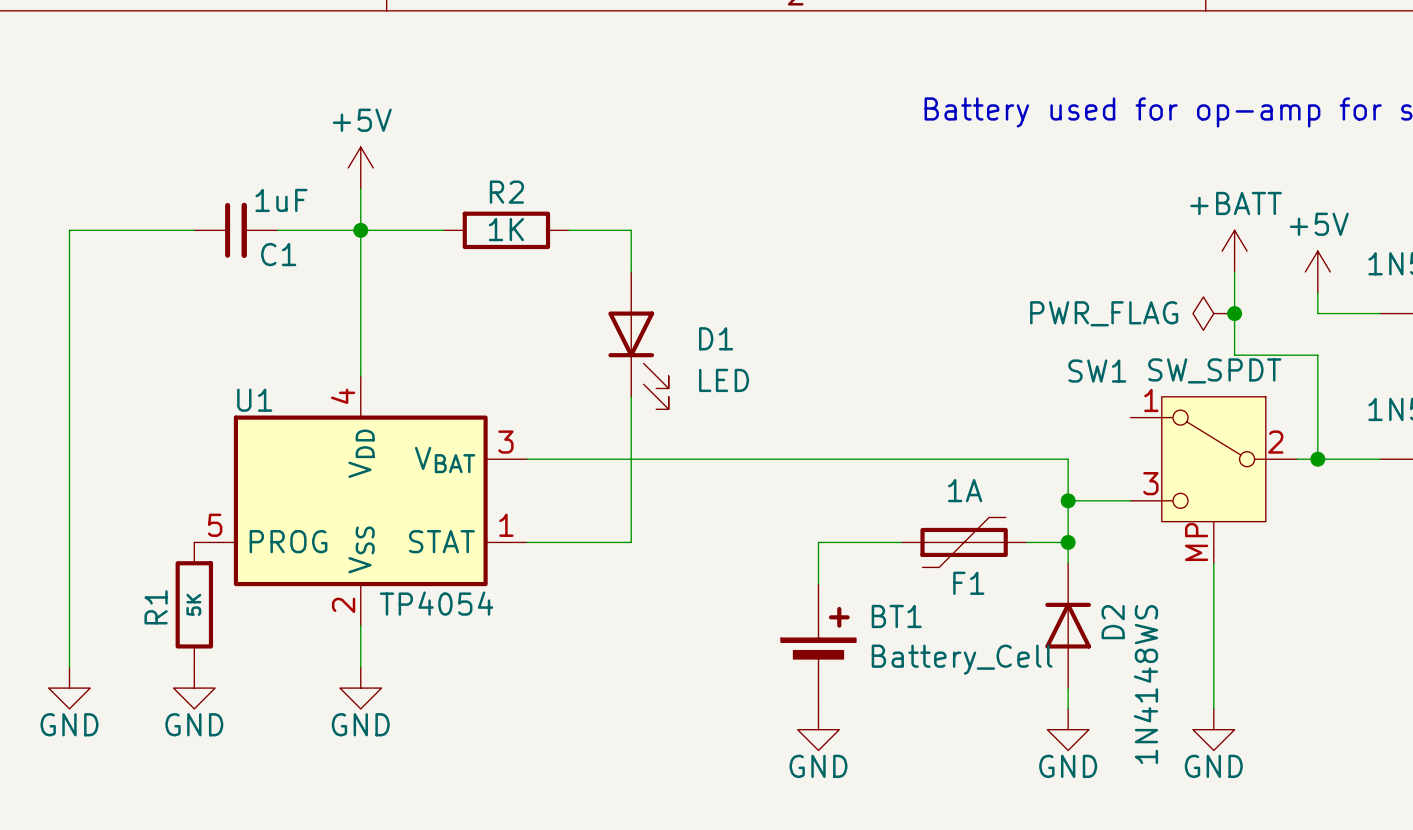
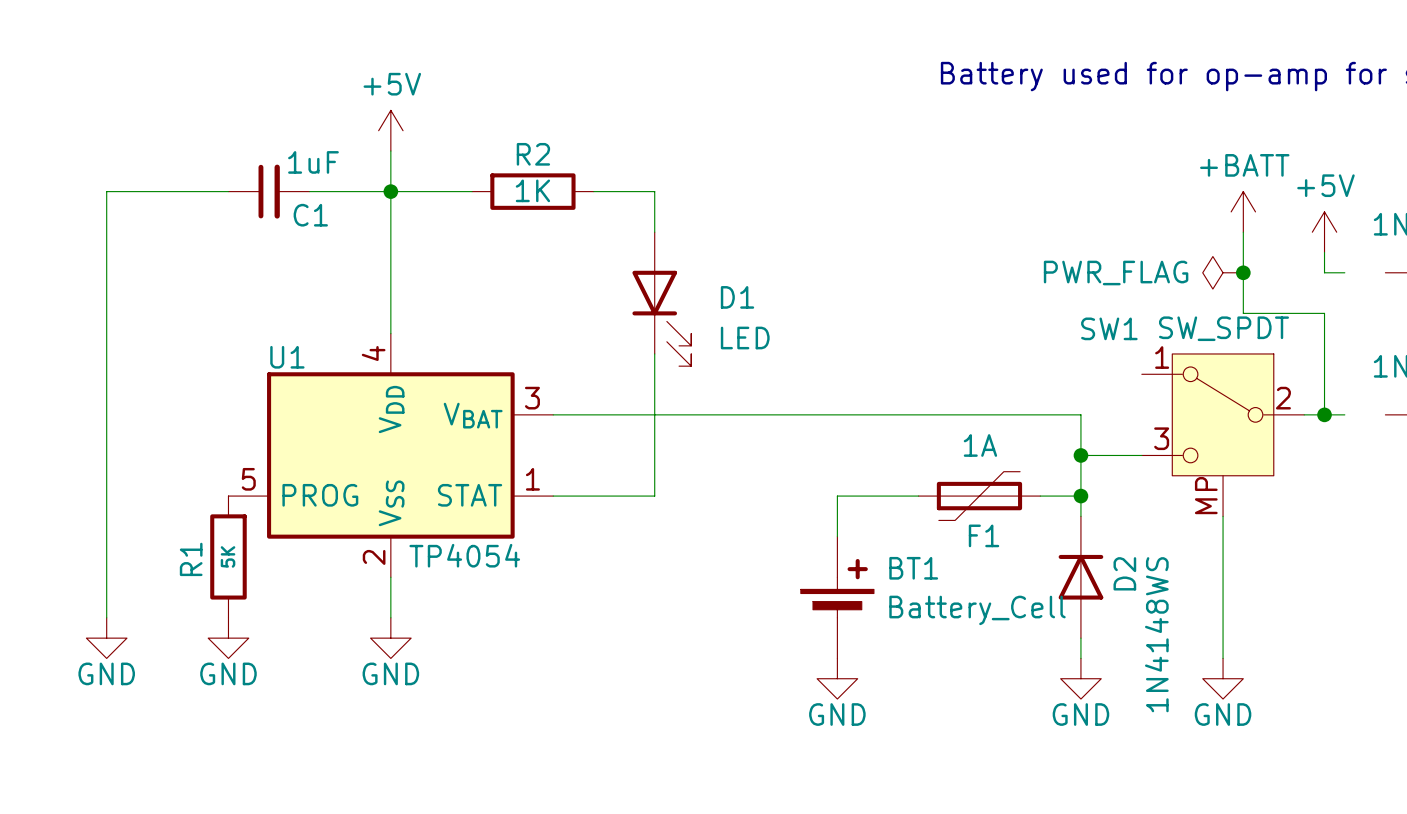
wire: (1338, 313) (1380, 313) -> none
wire: (1338, 459) (1380, 459) -> none

